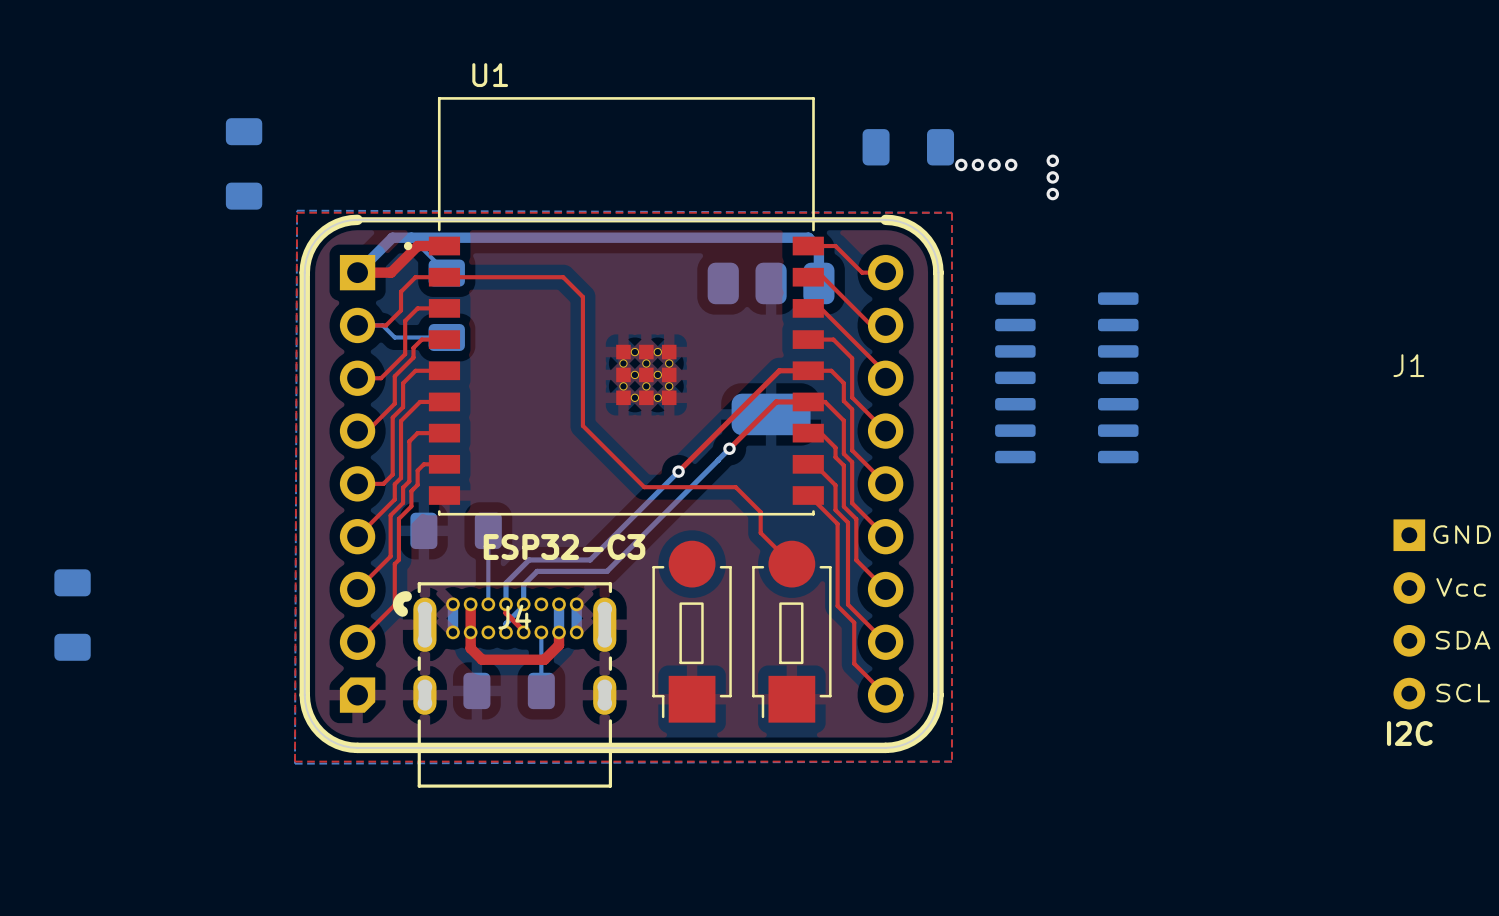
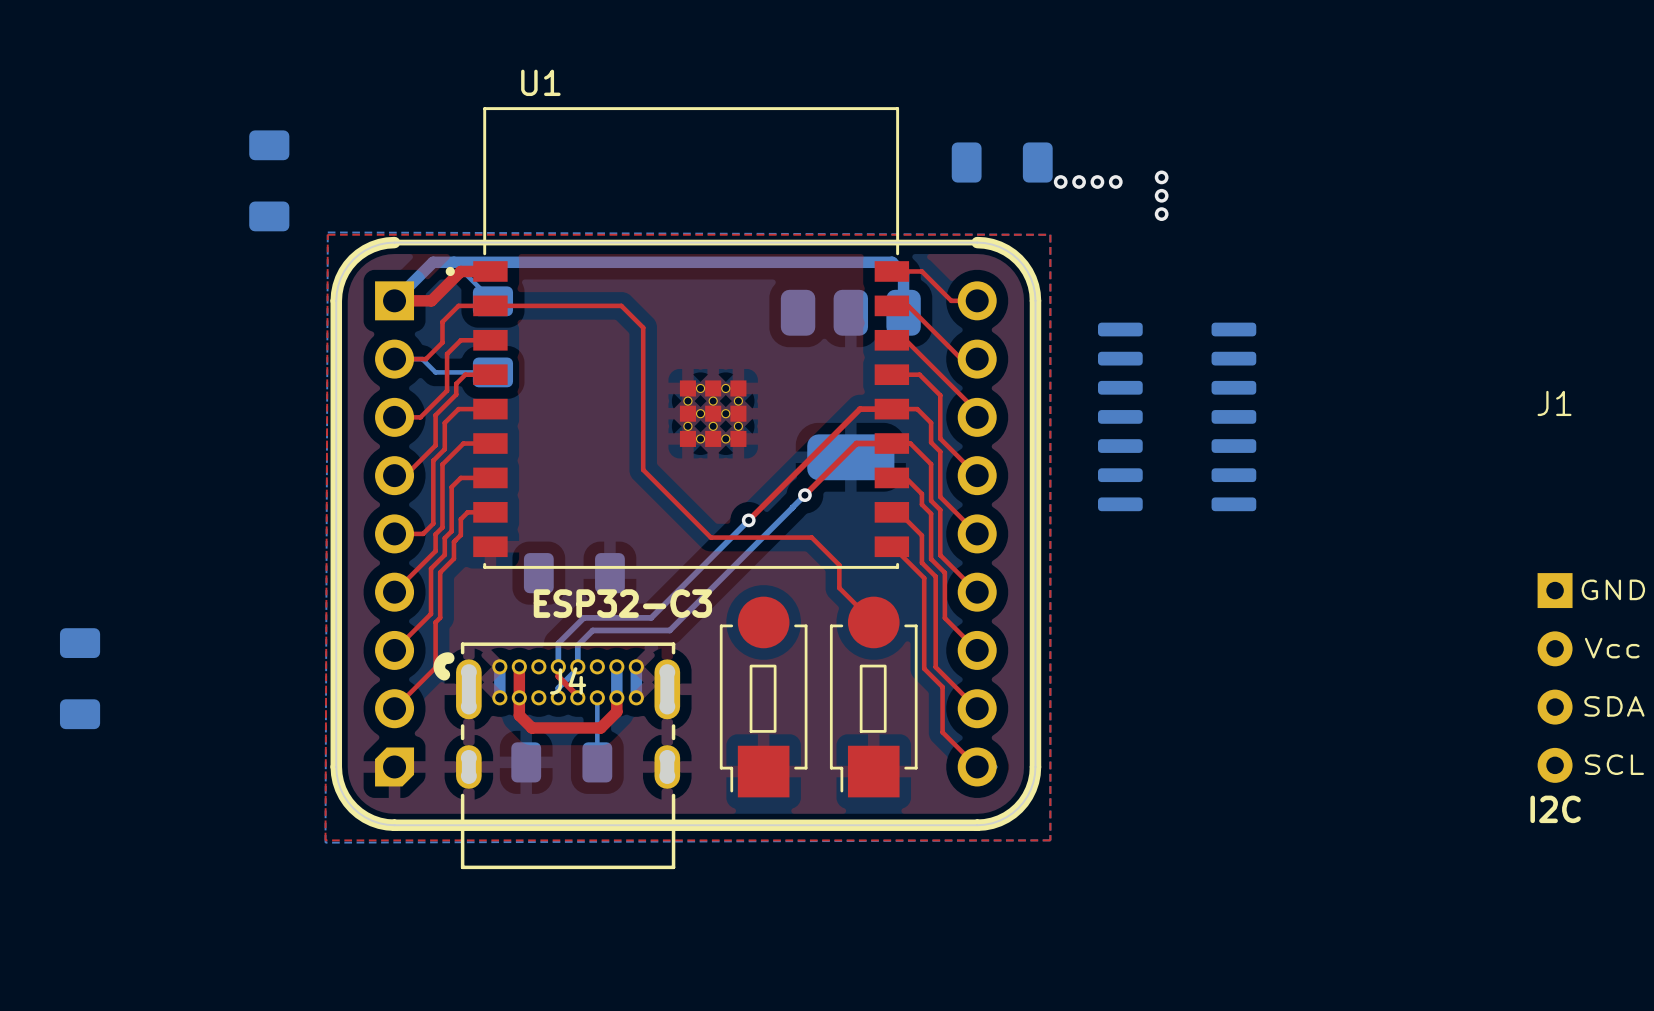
part position: (456, 530) -> (574, 573)
bottom track: (488, 530) (488, 604) -> none

